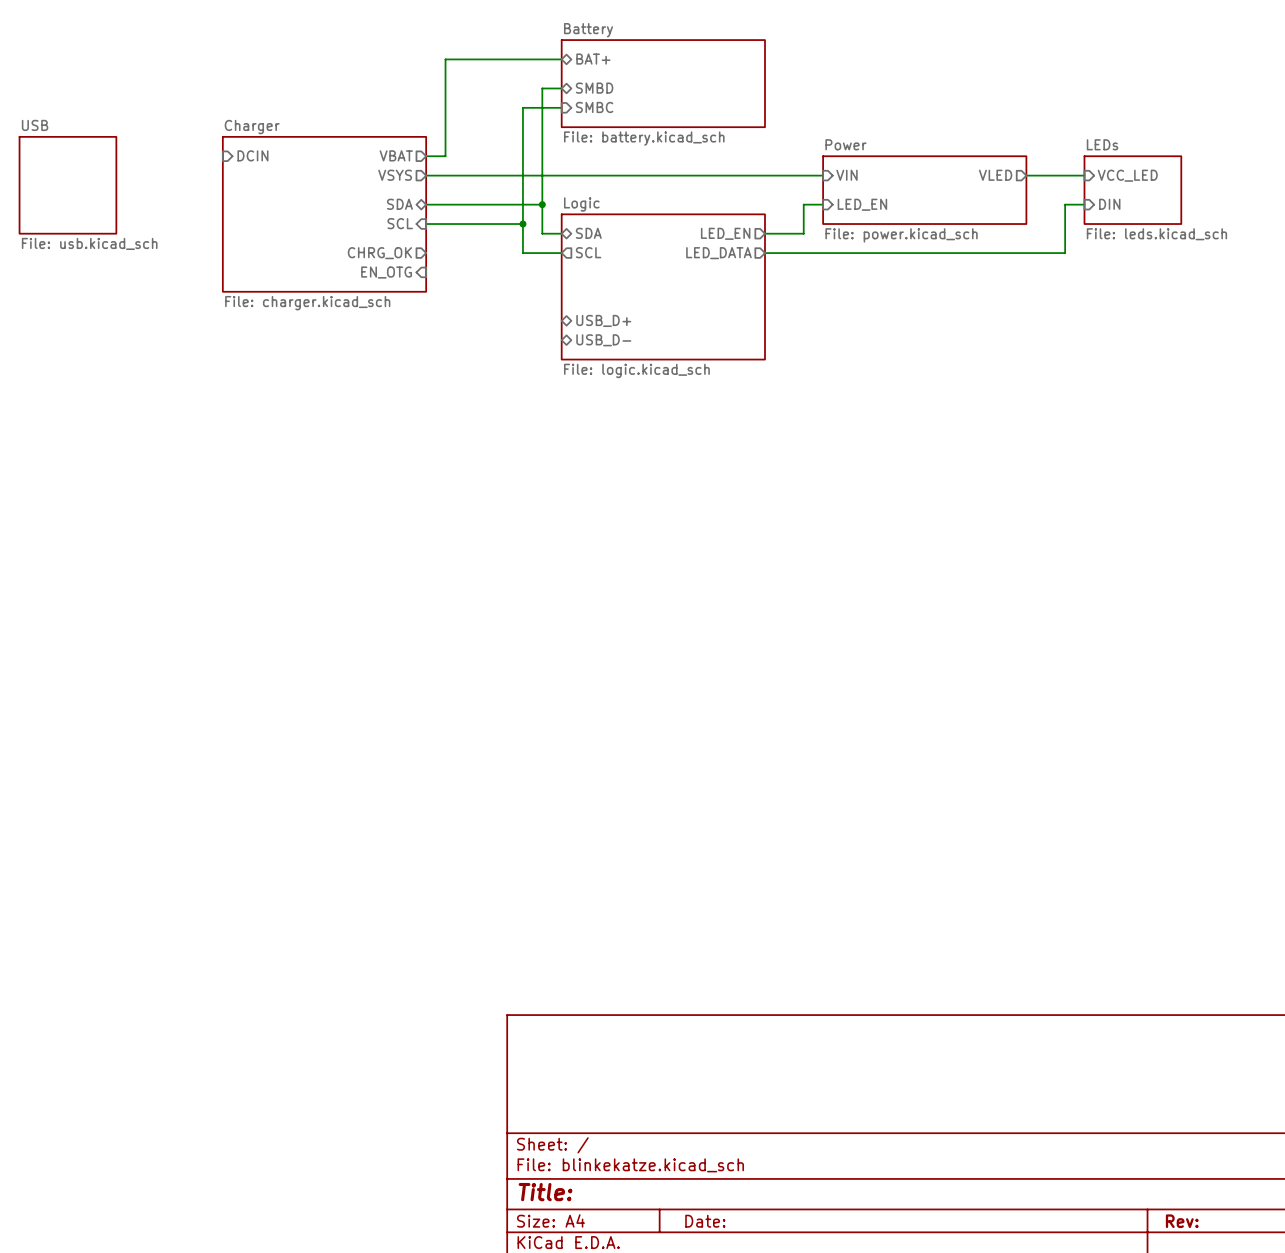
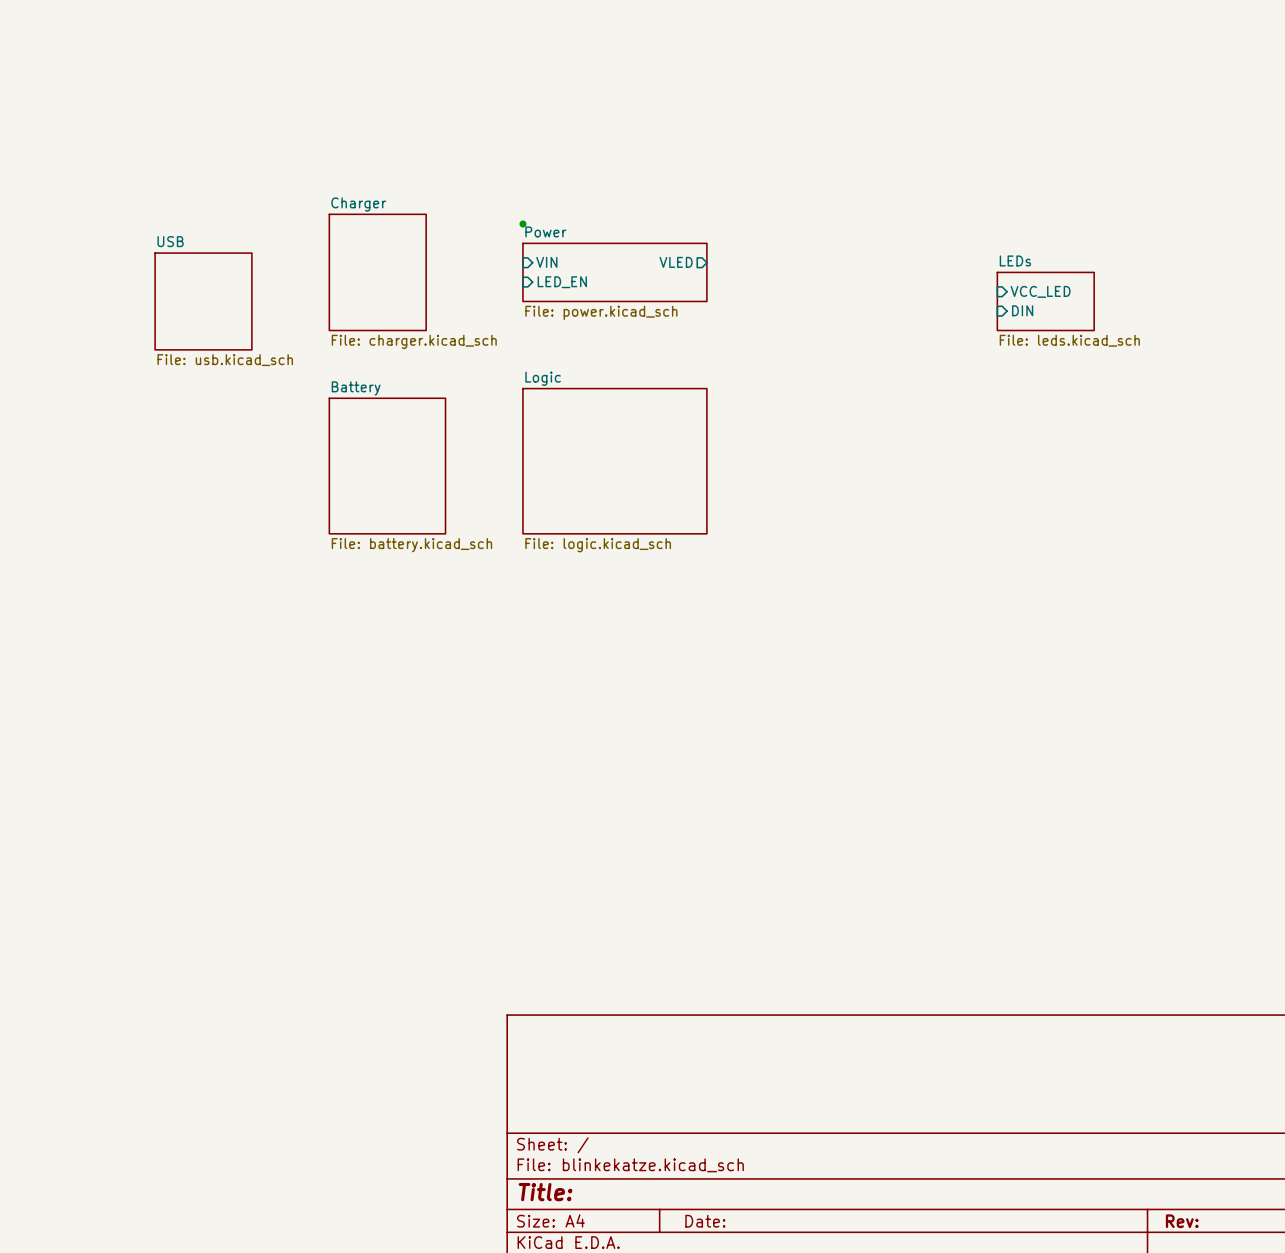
wire: (561, 59) (445, 59) (445, 156) (426, 156) -> none
sheet pin: BAT+ (593, 59) -> none
sheet Battery: File: battery.kicad_sch (663, 83) -> none
wire: (561, 88) (542, 88) (542, 233) (561, 233) -> none
sheet pin: SMBD (594, 88) -> none
wire: (561, 107) (522, 107) (522, 253) (561, 253) -> none
sheet pin: SMBC (594, 107) -> none
sheet pin: DCIN (252, 155) -> none
sheet pin: VBAT (396, 155) -> none
sheet pin: VSYS (395, 175) -> none
wire: (426, 175) (823, 175) -> none
sheet pin: VIN (846, 175) -> none
sheet pin: VLED (995, 175) -> none
wire: (1026, 175) (1084, 175) -> none
sheet pin position: VCC_LED (1127, 175) -> VCC_LED (1040, 291)
sheet USB position: (67, 185) -> (203, 301)
sheet Power: File: power.kicad_sch (924, 190) -> none
sheet LEDs: File: leds.kicad_sch (1132, 190) -> none
sheet pin: SDA (399, 204) -> none
wire: (426, 204) (542, 204) -> none
junction: (542, 204) -> none
wire: (823, 204) (803, 204) (803, 233) (765, 233) -> none
sheet pin: LED_EN (862, 204) -> none
wire: (1084, 204) (1065, 204) (1065, 253) (765, 253) -> none
sheet pin position: DIN (1109, 204) -> DIN (1022, 310)
sheet Charger: File: charger.kicad_sch (324, 214) -> none
sheet pin: SCL (400, 223) -> none
wire: (426, 224) (522, 224) -> none
sheet pin: SDA (588, 233) -> none
sheet pin: LED_EN (725, 233) -> none
sheet pin: SCL (588, 252) -> none
sheet pin: CHRG_OK (379, 253) -> none
sheet pin: LED_DATA (718, 253) -> none
sheet pin: none -> VIN (546, 262)
sheet pin: none -> VLED (676, 262)
sheet Charger: none -> File: charger.kicad_sch (377, 272)
sheet pin: EN_OTG (386, 272) -> none
sheet Power: none -> File: power.kicad_sch (614, 272)
sheet pin: none -> LED_EN (562, 282)
sheet Logic: File: logic.kicad_sch (663, 286) -> none
sheet LEDs: none -> File: leds.kicad_sch (1045, 301)
sheet pin: USB_D+ (603, 320) -> none
sheet pin: USB_D- (603, 340) -> none
sheet Logic: none -> File: logic.kicad_sch (614, 461)
sheet Battery: none -> File: battery.kicad_sch (387, 466)

